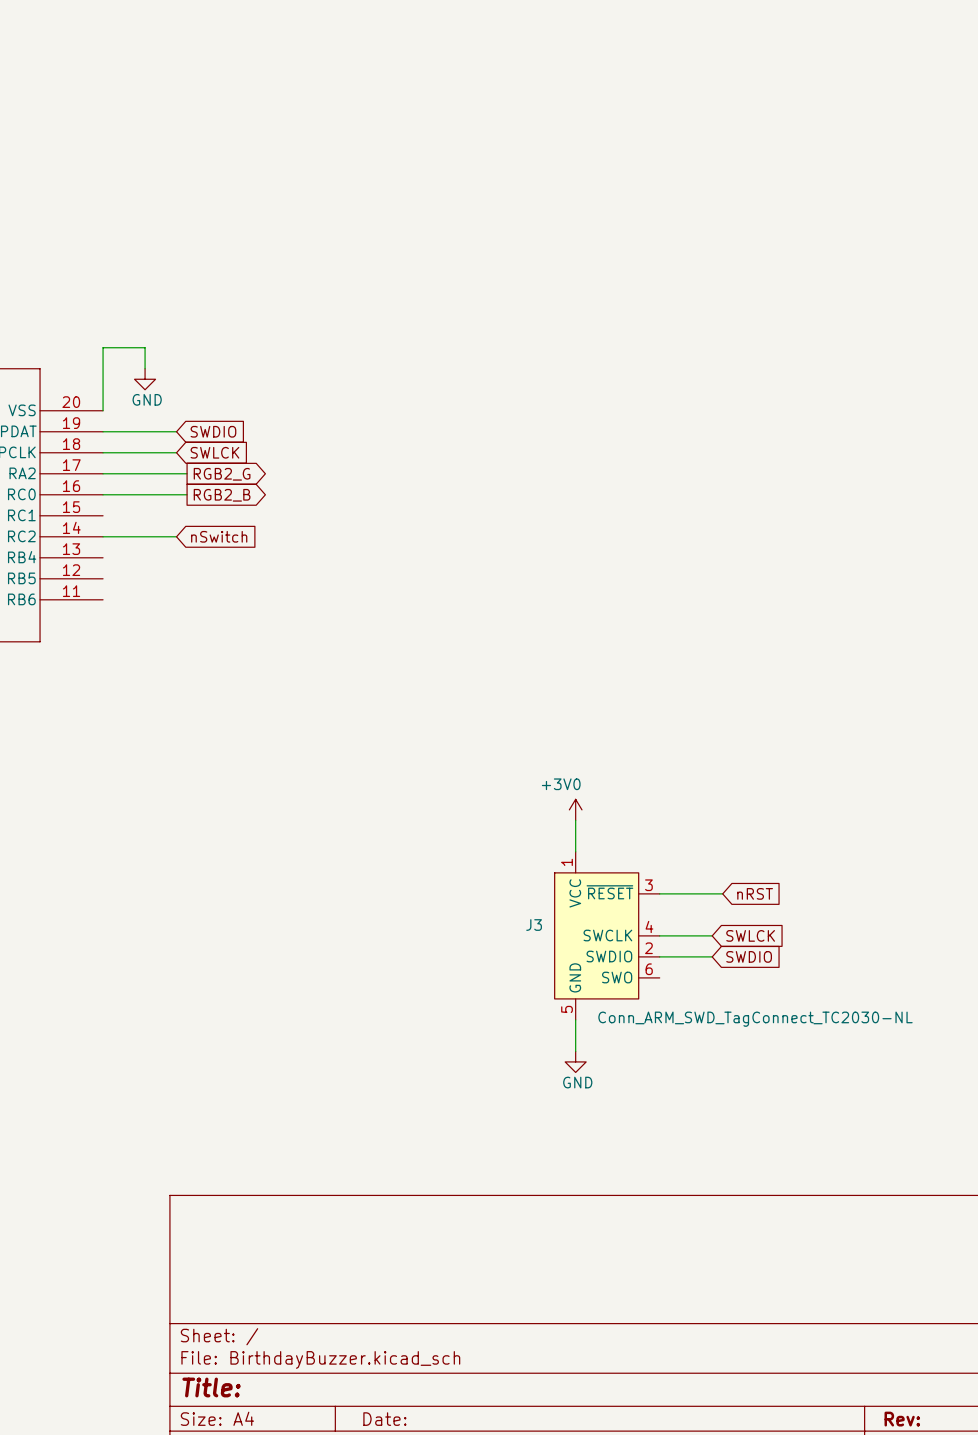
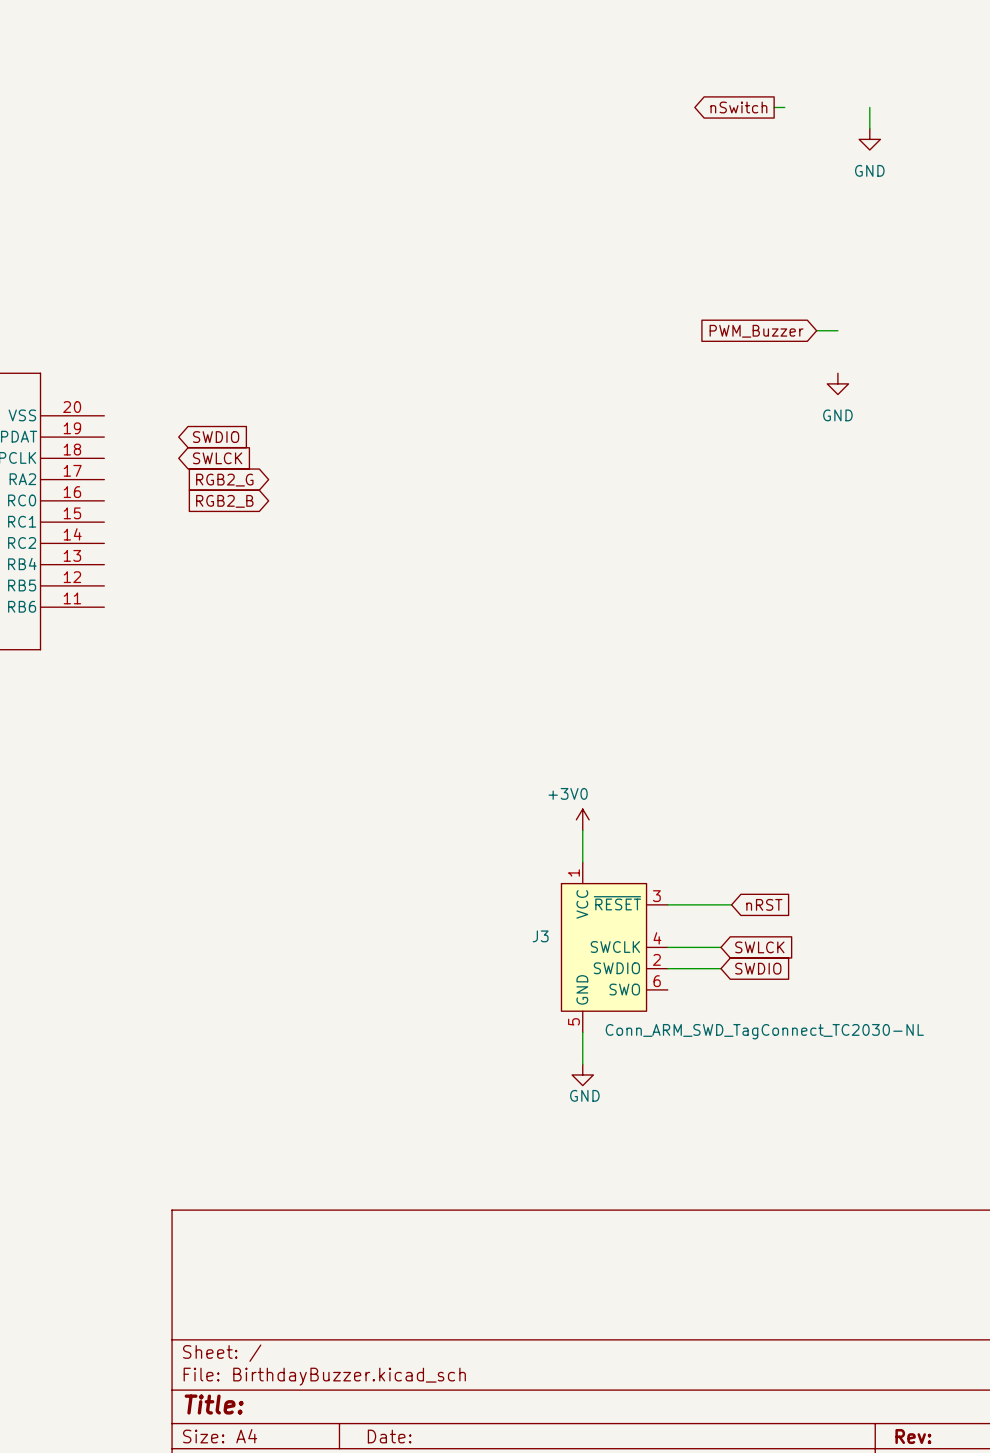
global label: none -> nSwitch (738, 107)
wire: none -> (774, 107) (784, 107)
wire: none -> (869, 107) (869, 128)
power symbol: none -> GND (869, 139)
wire: none -> (816, 330) (837, 330)
global label: none -> PWM_Buzzer (756, 331)
wire: (145, 368) (145, 347) (103, 347) (103, 410) -> none
power symbol: GND (145, 379) -> none
power symbol: none -> GND (837, 383)
wire: (103, 431) (176, 431) -> none
wire: (103, 452) (176, 452) -> none
wire: (103, 473) (187, 473) -> none
wire: (103, 494) (187, 494) -> none
wire: (103, 536) (176, 536) -> none
global label: nSwitch (219, 536) -> none

